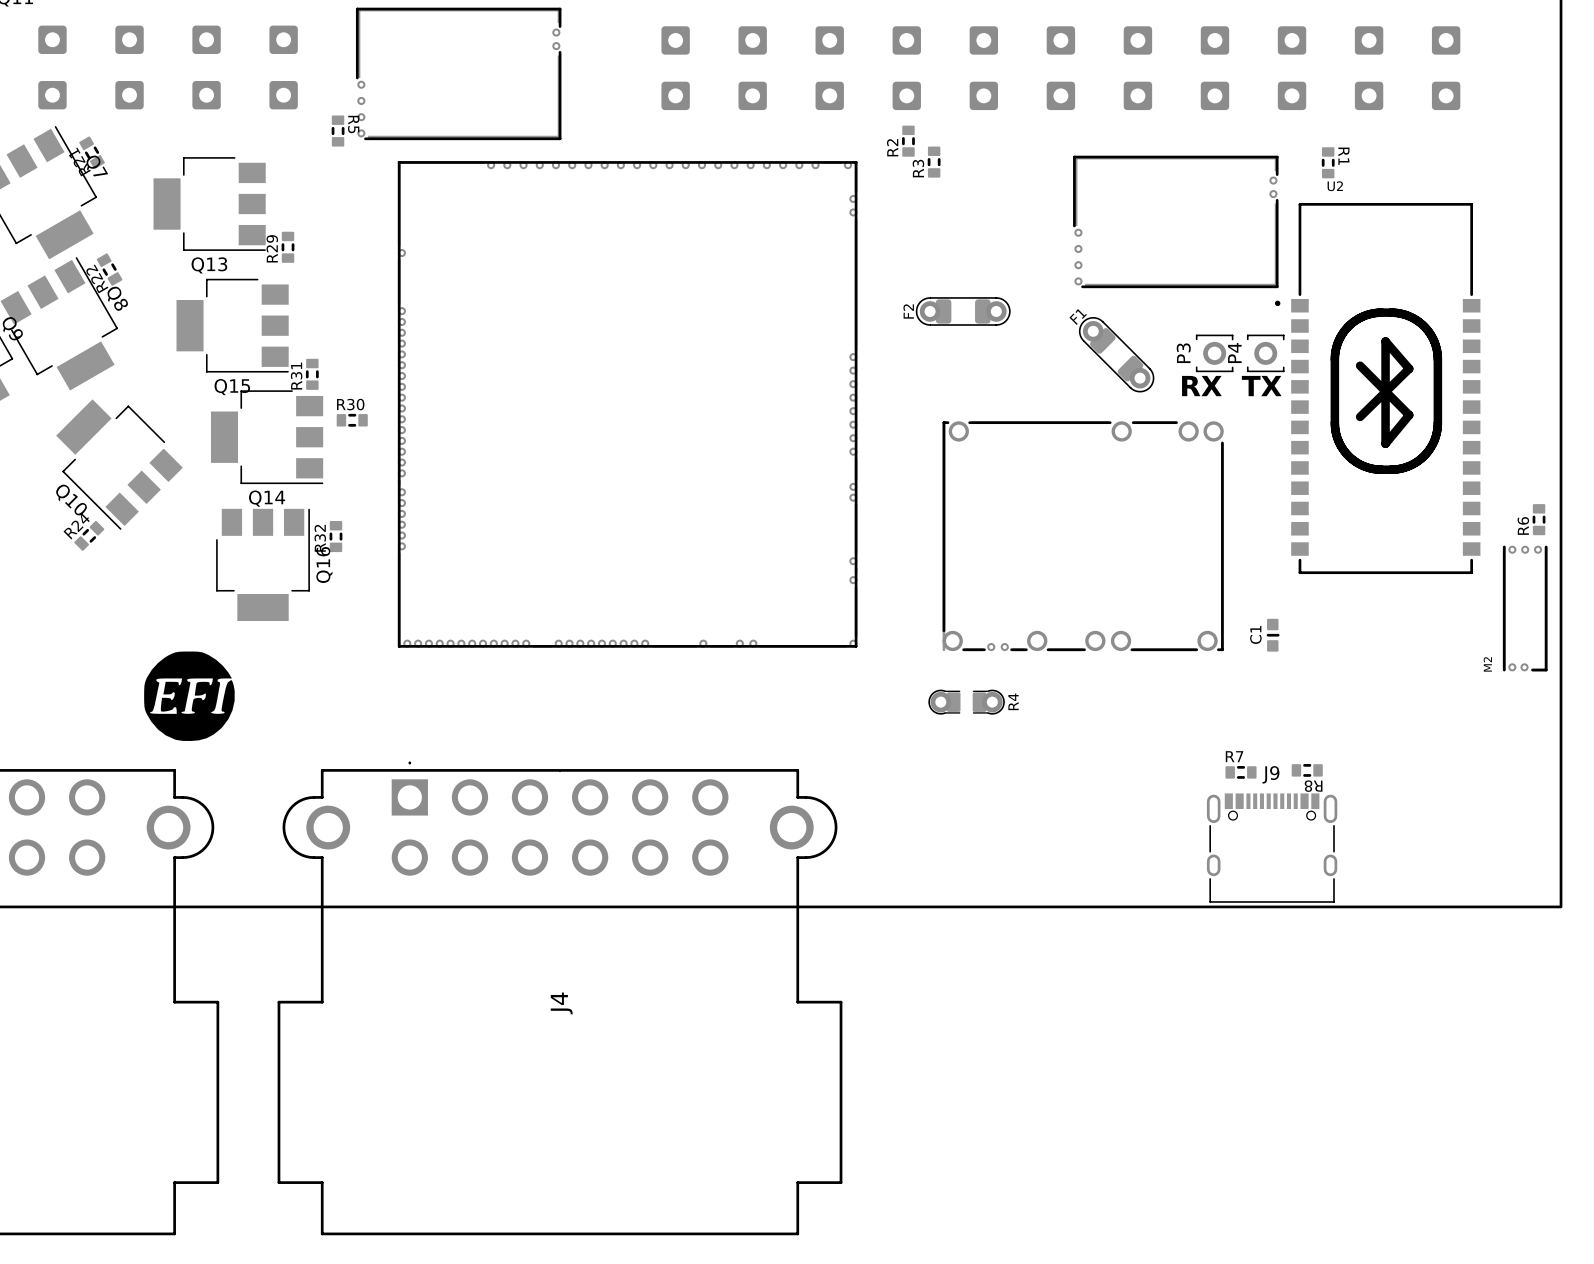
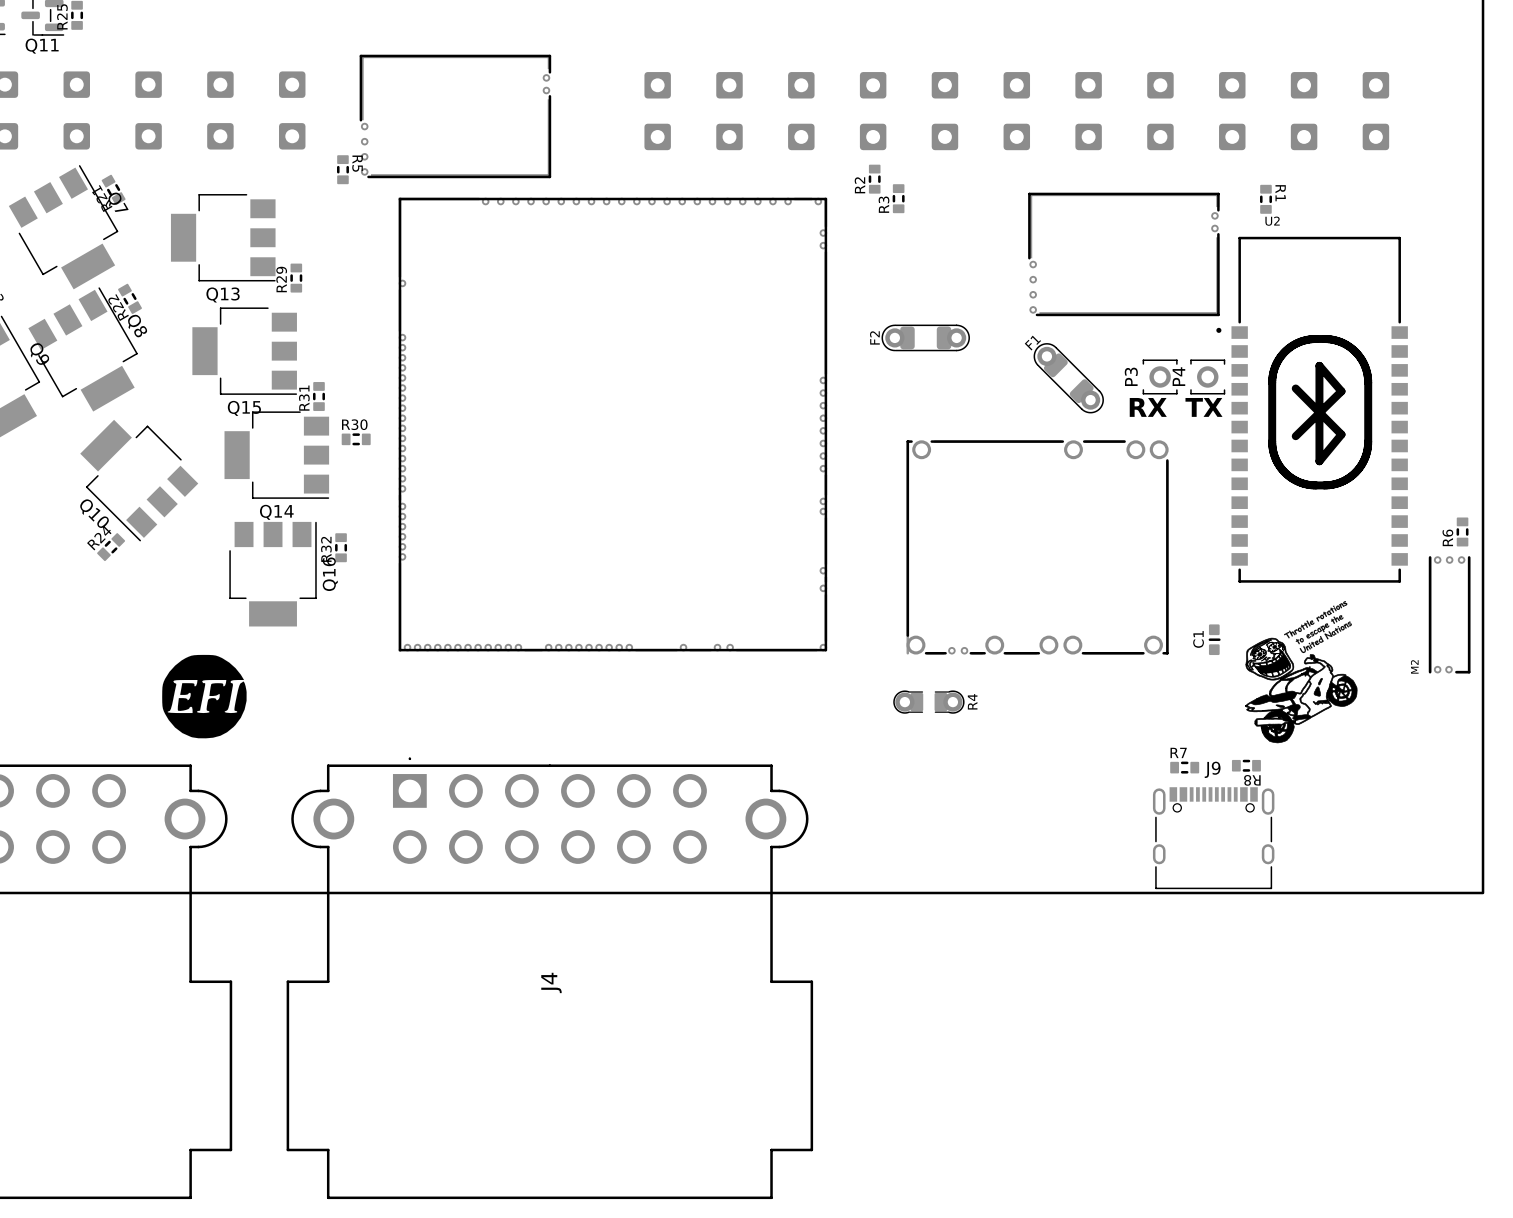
drawing: none -> [1245, 601, 1358, 744]

